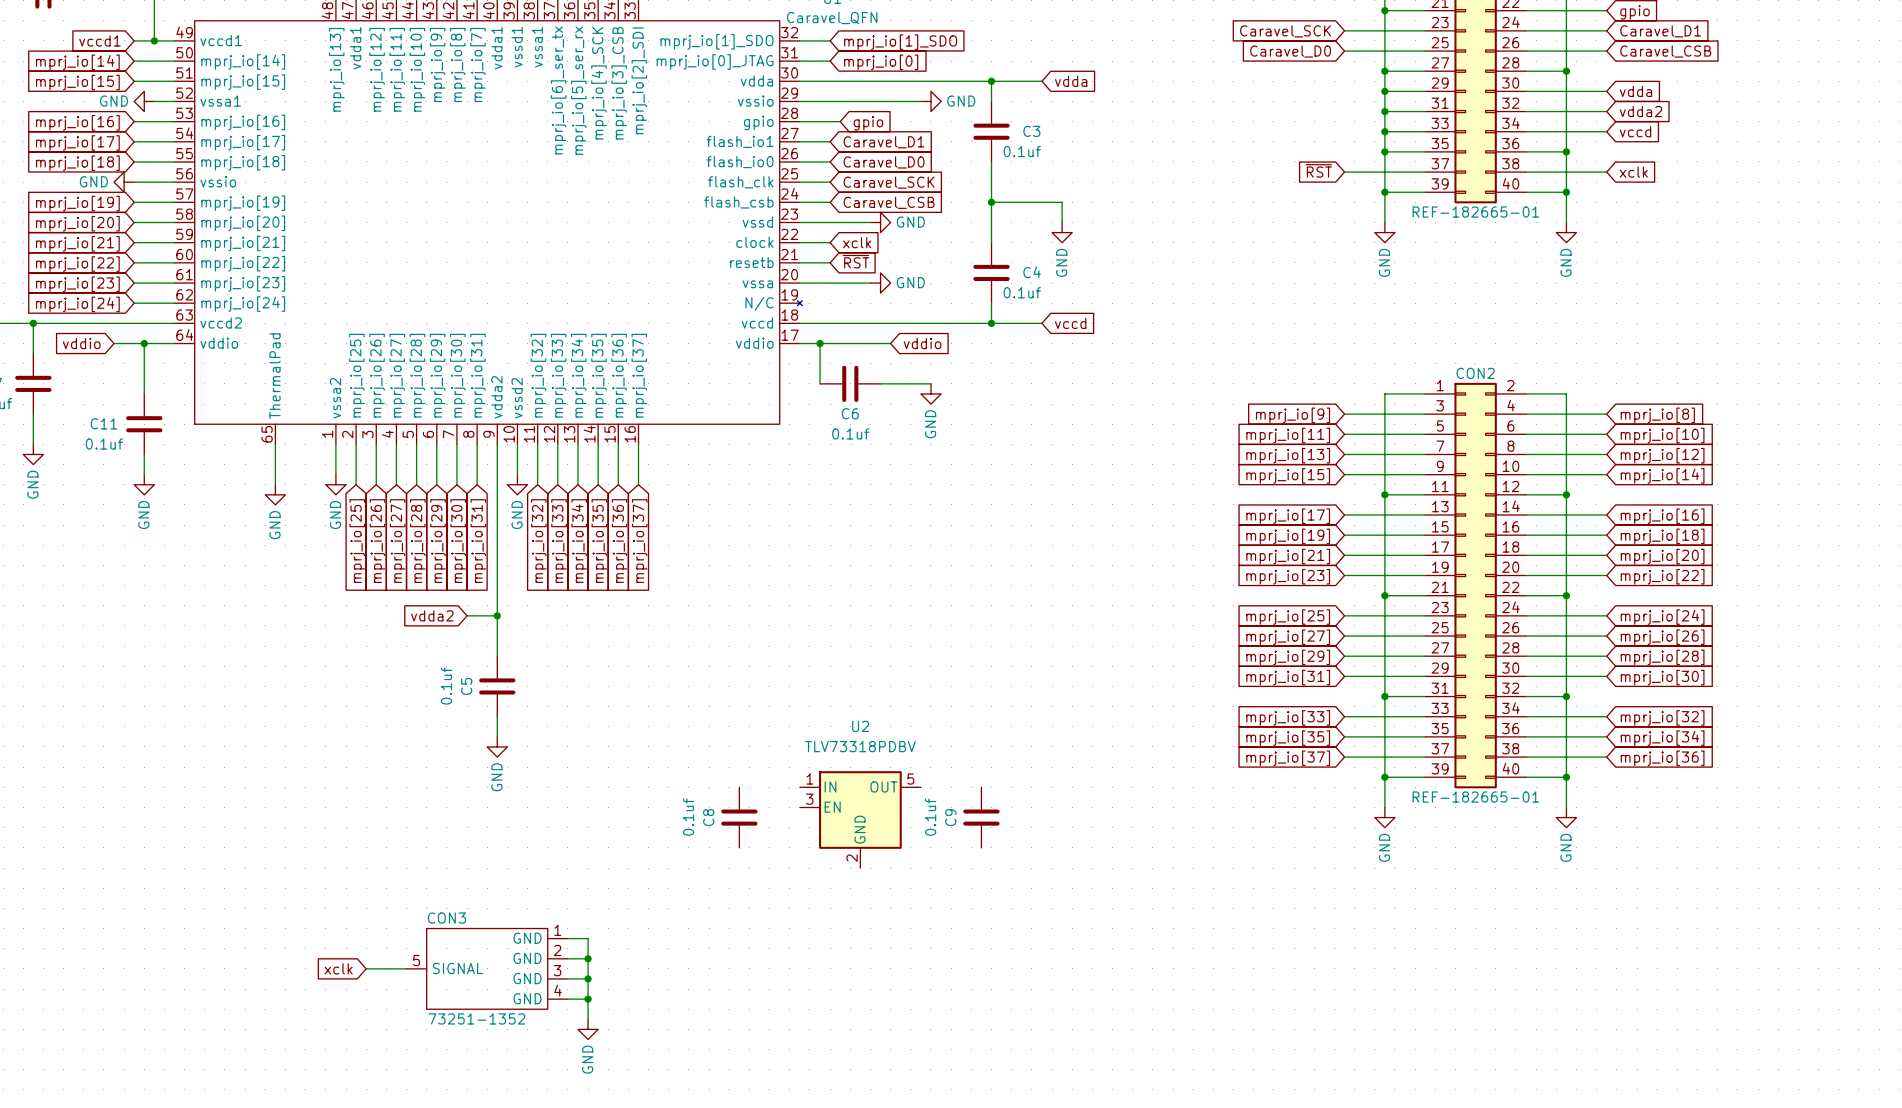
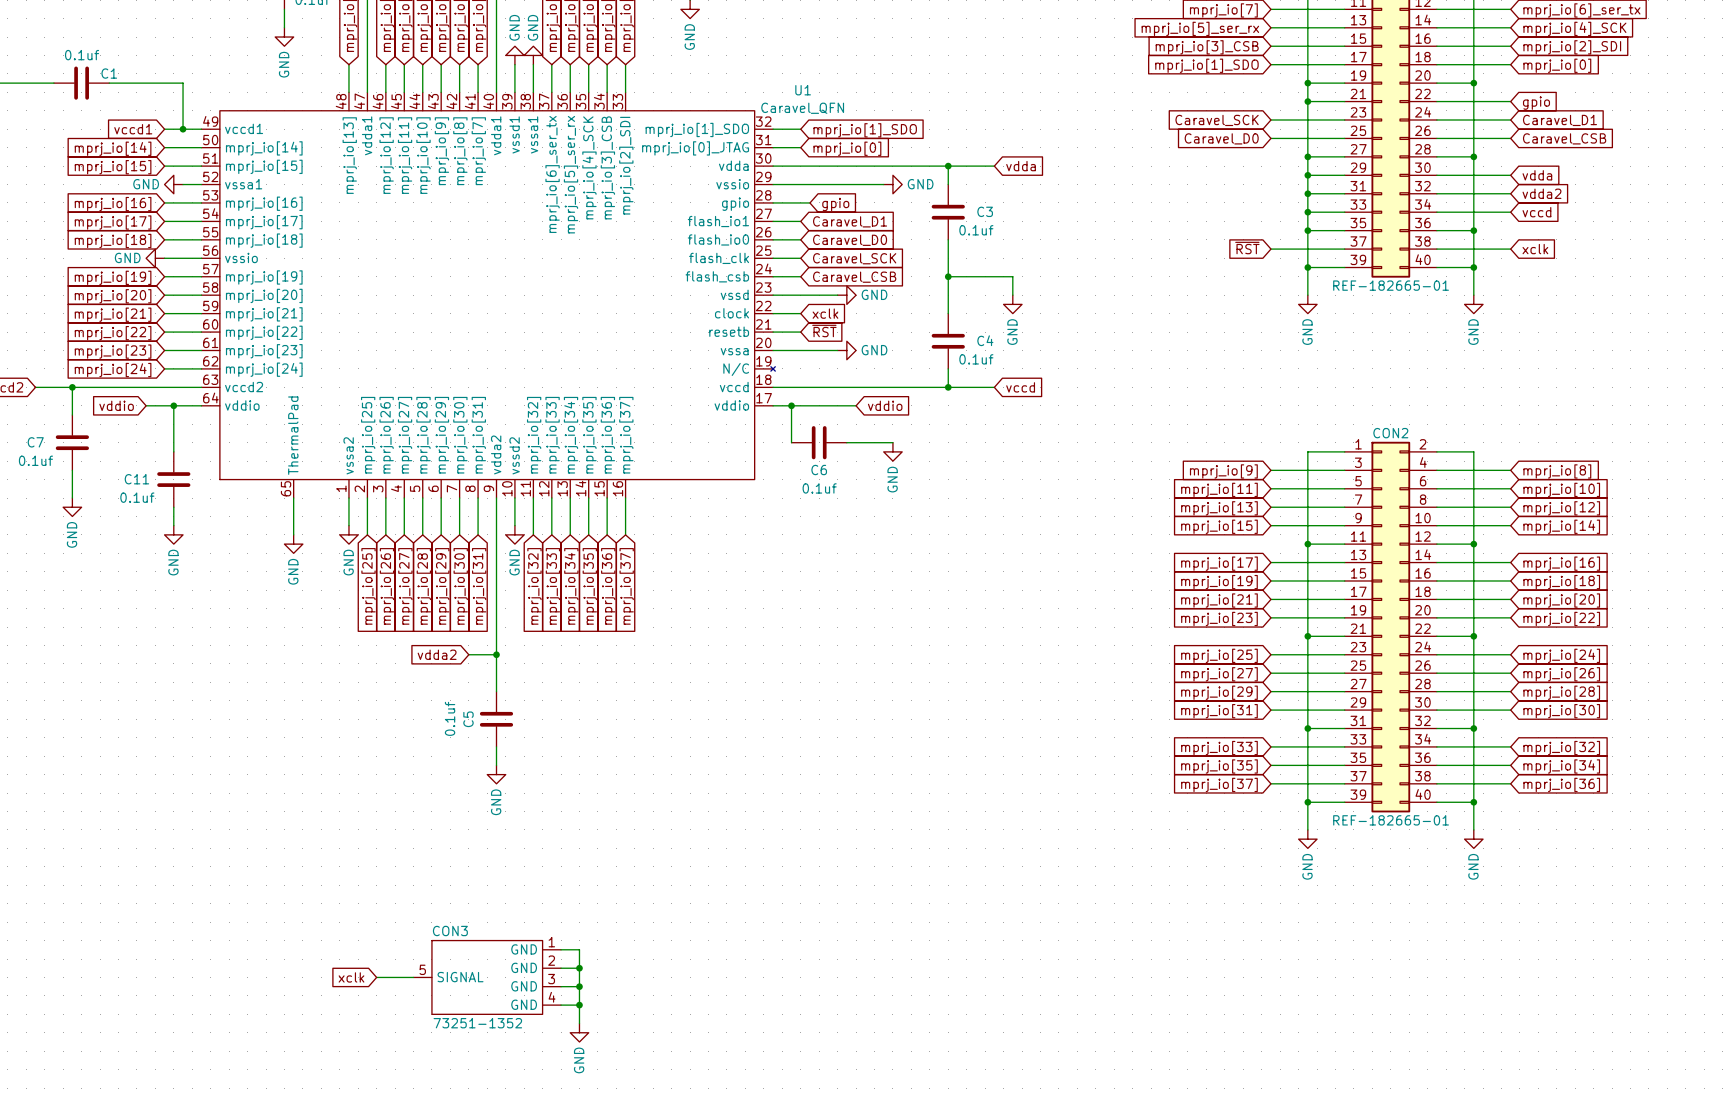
C8: 0.1uf (739, 817) -> none
C9: 0.1uf (981, 817) -> none
U2: TLV73318PDBV (860, 819) -> none

